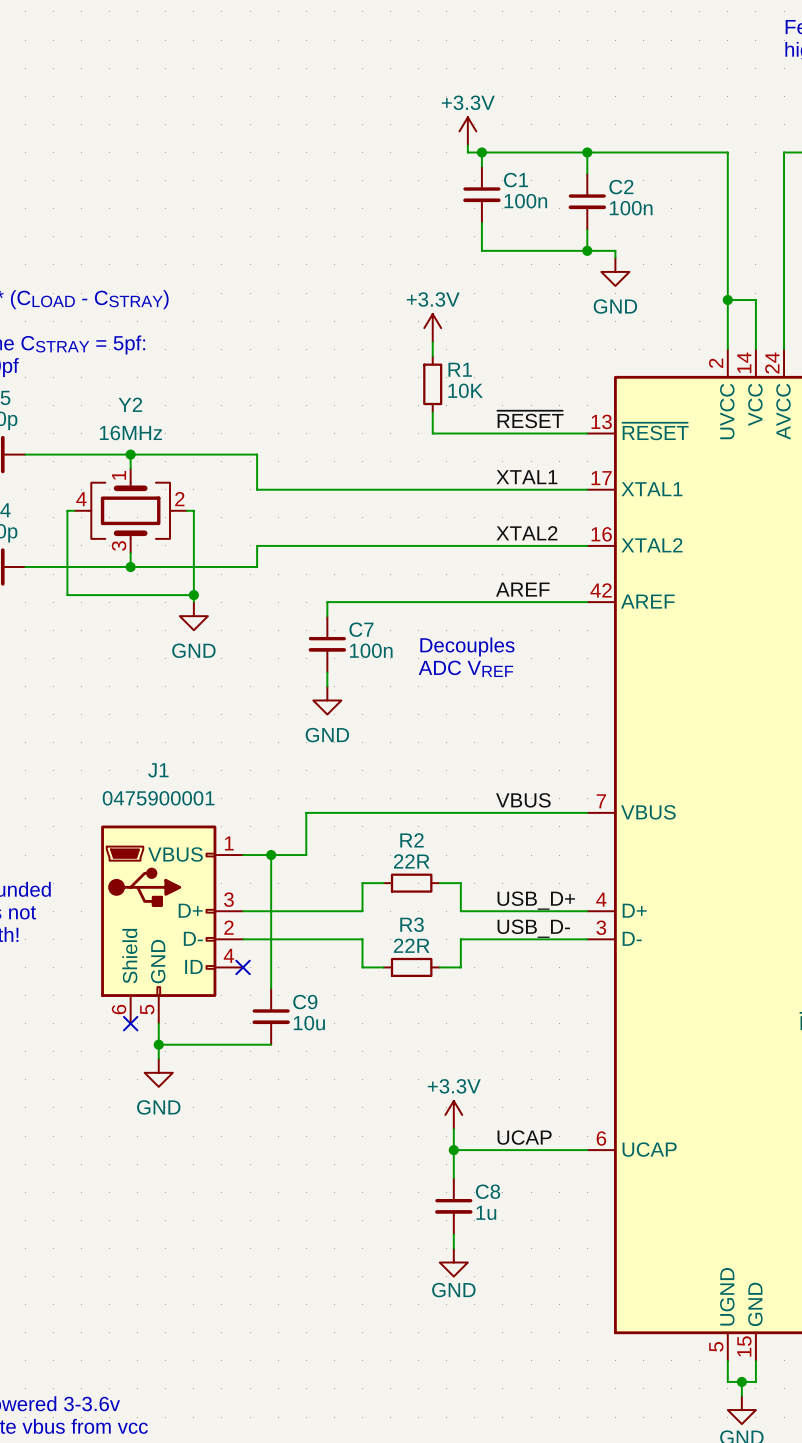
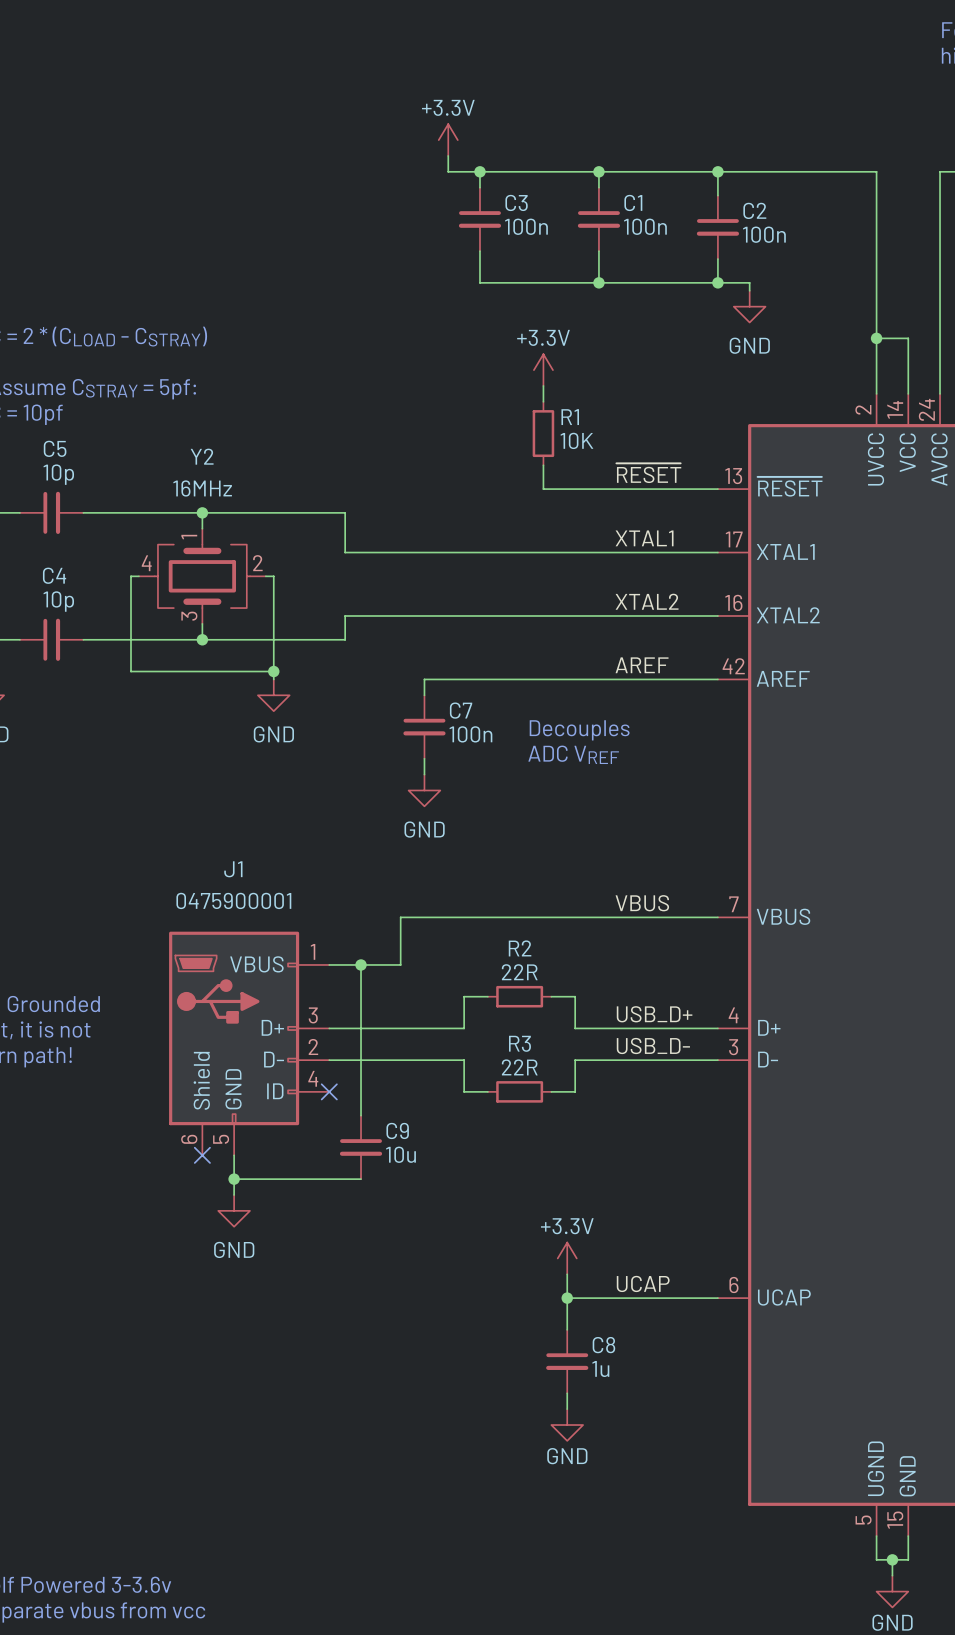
power symbol position: +3.3V (467, 131) -> +3.3V (448, 140)
wire: (467, 145) (467, 152) -> (448, 155) (448, 171) (583, 171)
wire: none -> (479, 171) (479, 187)
junction: none -> (479, 171)
C3: none -> 100n (479, 219)
wire: none -> (479, 251) (479, 282) (598, 282)
junction: none -> (598, 282)

